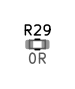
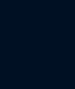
R29: 0R (37, 44) -> none

